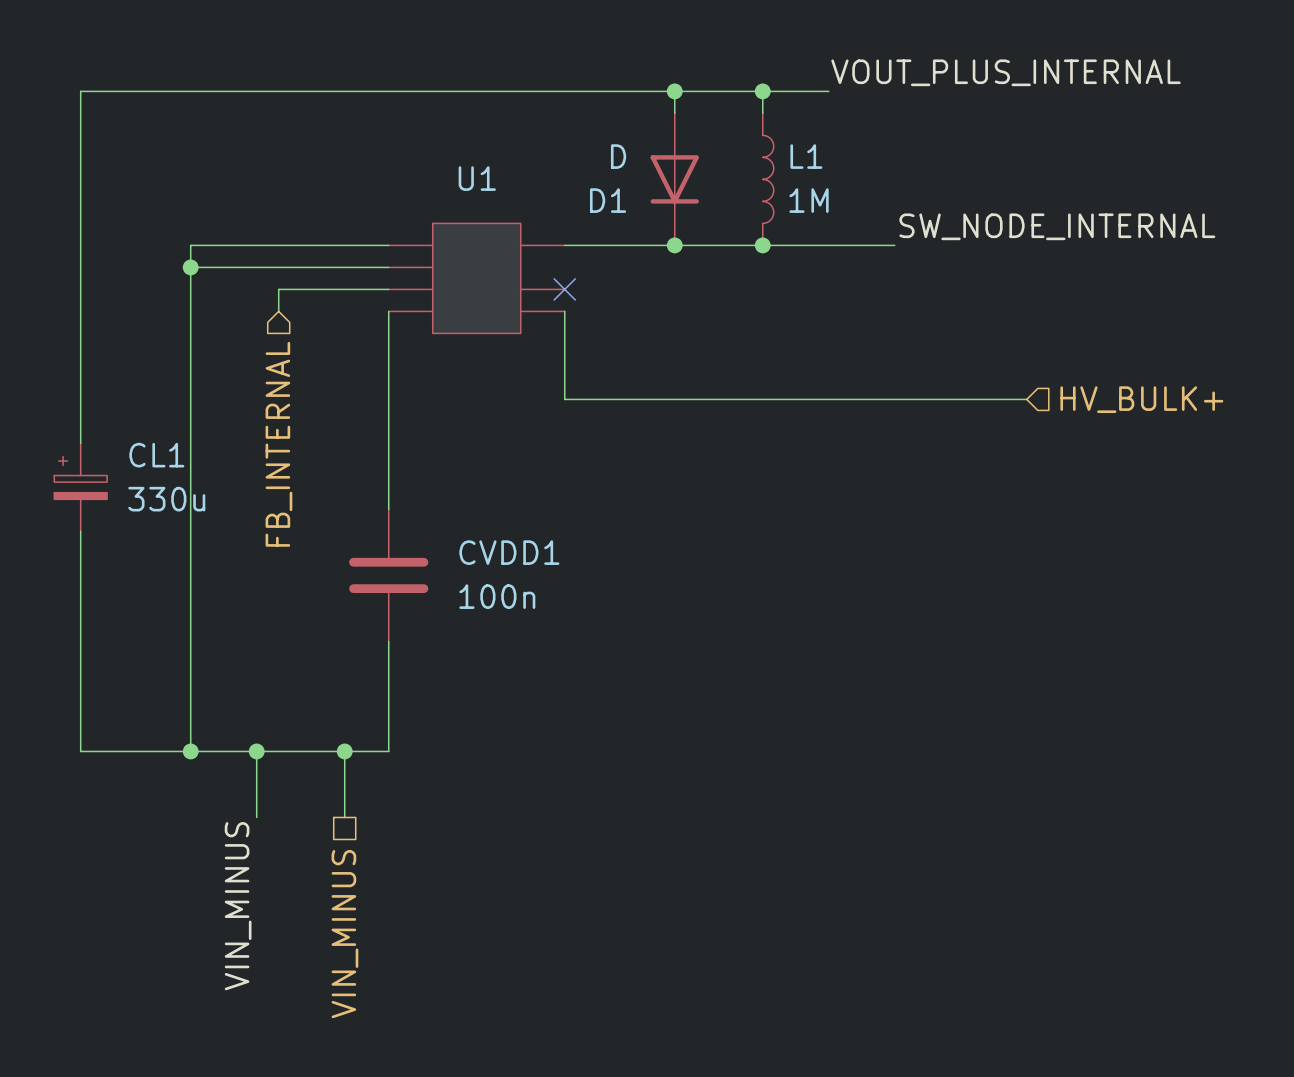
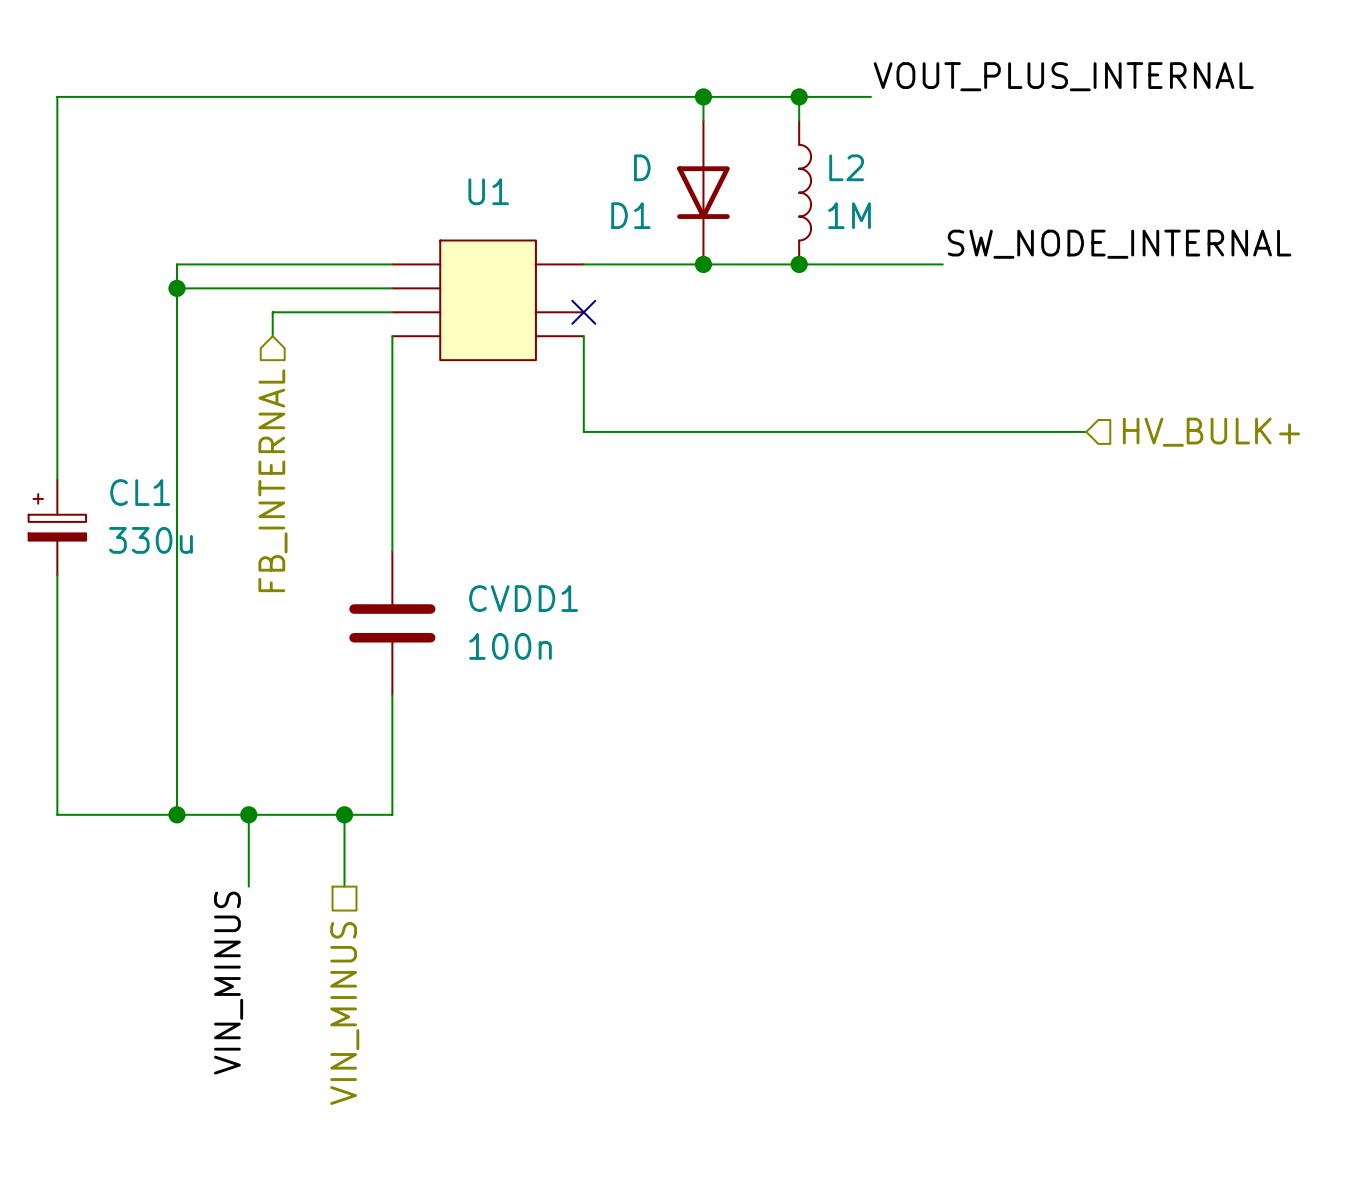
L1 name: L1 (806, 156) -> L2 (846, 167)

